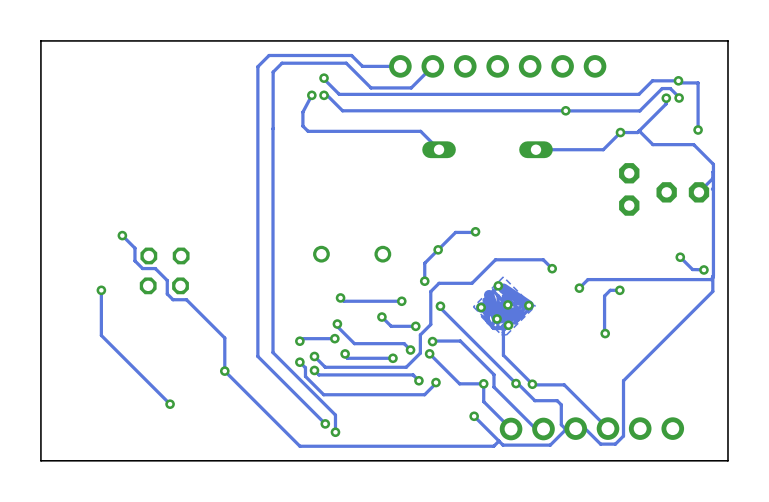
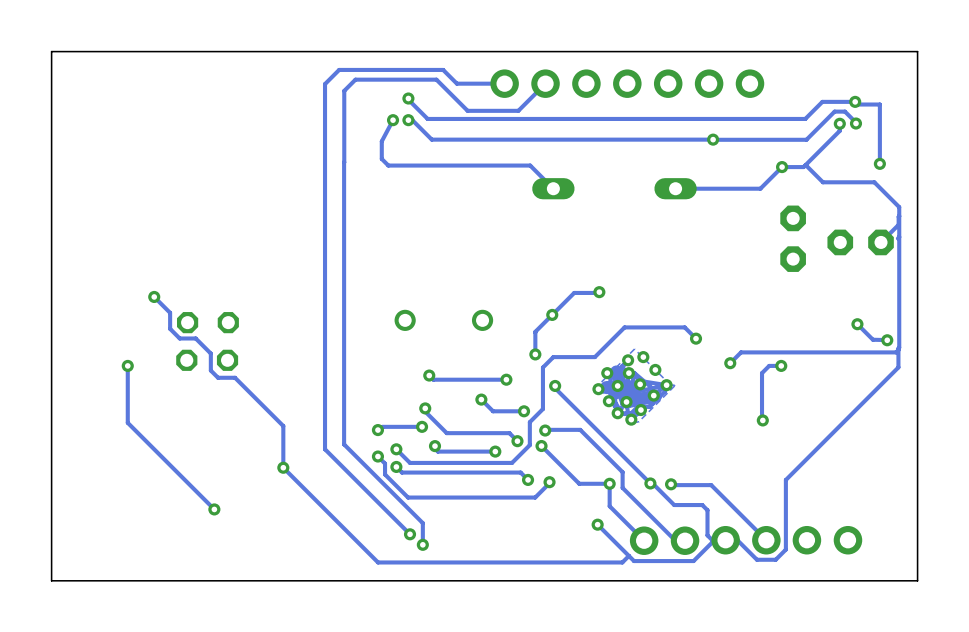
via: none -> (643, 357)
track: (503, 288) (528, 305) -> none
via: none -> (655, 369)
via: none -> (607, 373)
via: none -> (628, 373)
via: none -> (617, 385)
via: (481, 307) -> none
via: none -> (598, 389)
via: none -> (653, 395)
via: none -> (608, 401)
track: (503, 325) (503, 355) (533, 384) -> none
via: none -> (617, 413)
via: none -> (631, 419)

